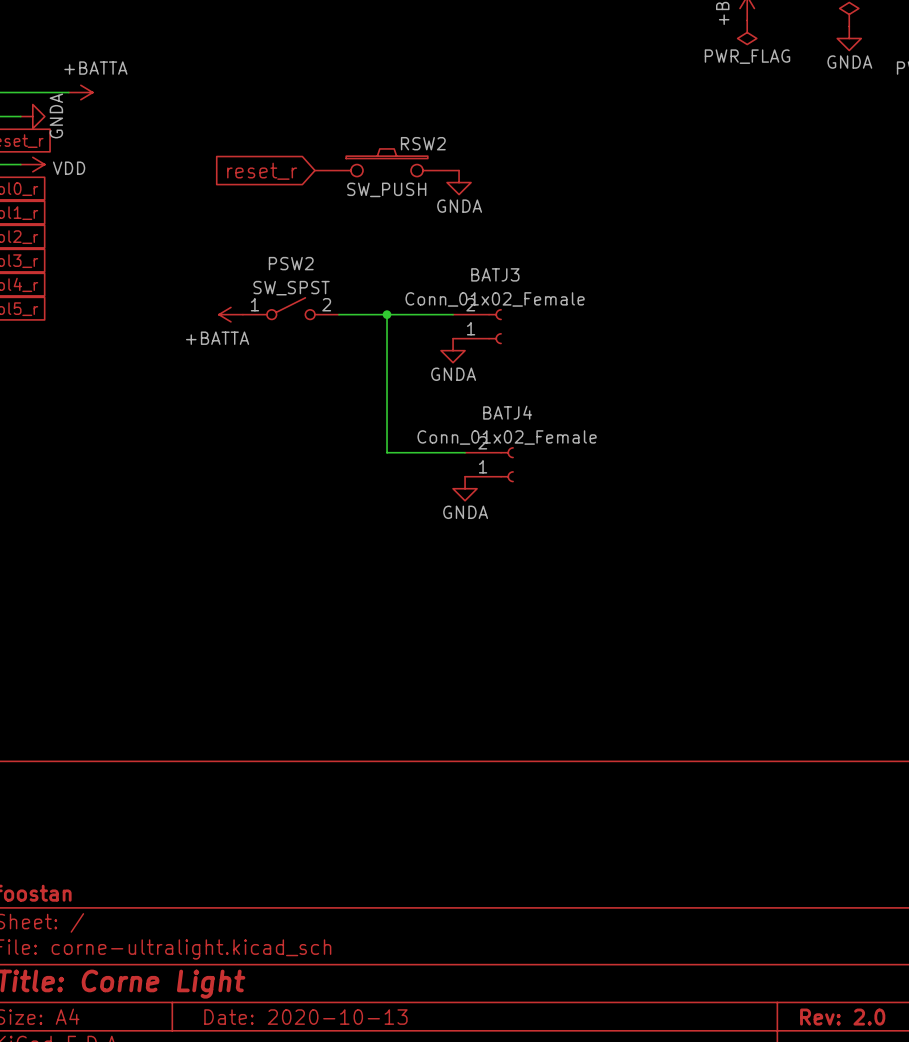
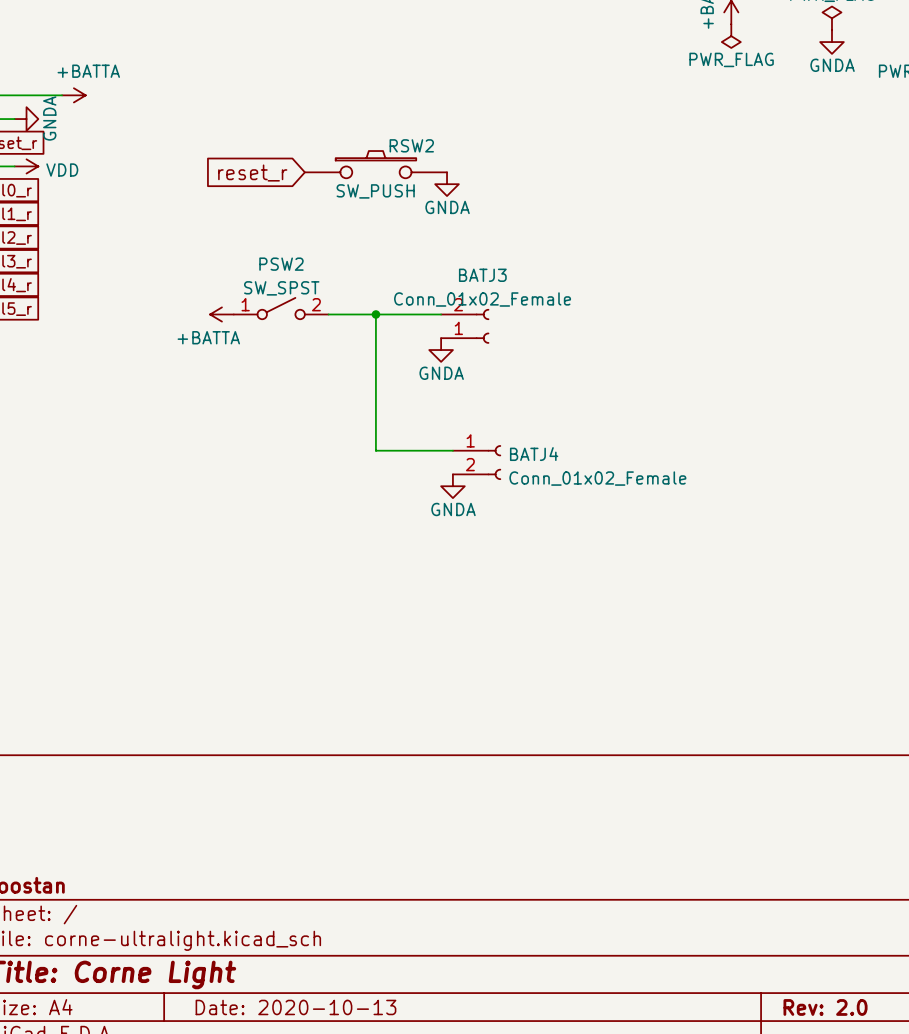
BATJ4 name position: BATJ4 (507, 412) -> BATJ4 (534, 454)
BATJ4 value position: Conn_01x02_Female (507, 437) -> Conn_01x02_Female (597, 478)
BATJ4 flip: as is (507, 464) -> up-down (494, 462)

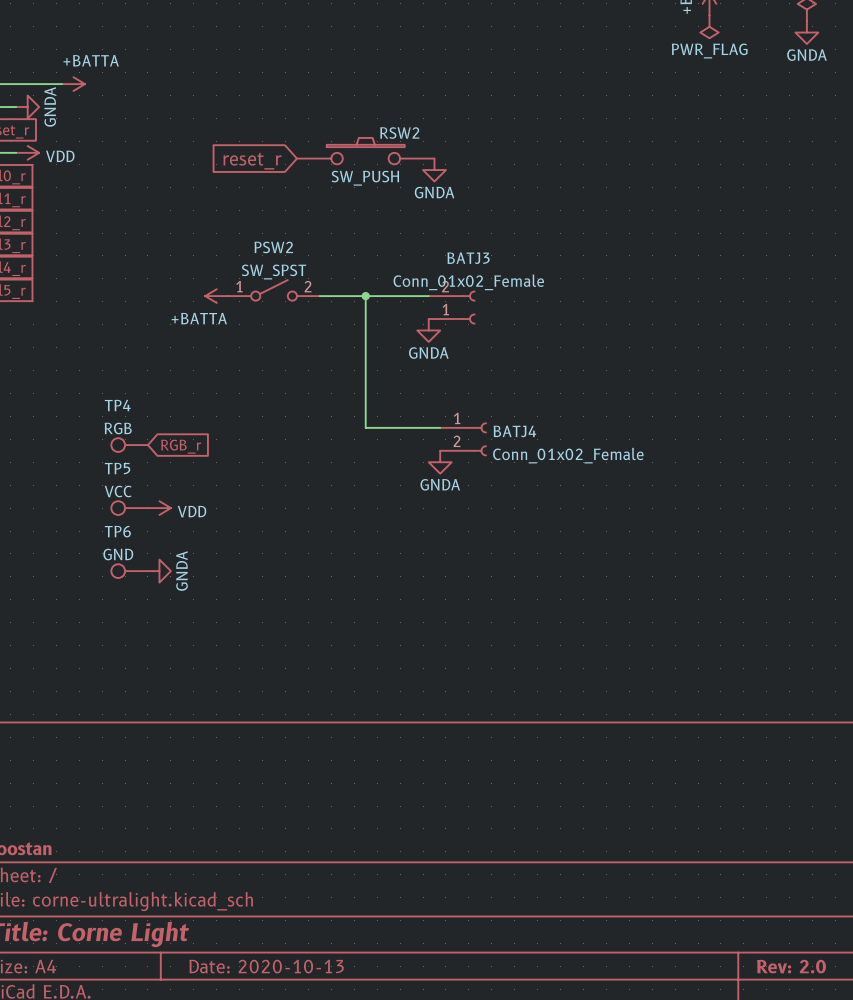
TP4: none -> RGB (129, 445)
global label: none -> RGB_r (181, 446)
TP5: none -> VCC (129, 508)
power symbol: none -> VDD (159, 508)
TP6: none -> GND (129, 571)
power symbol: none -> GNDA (159, 571)

